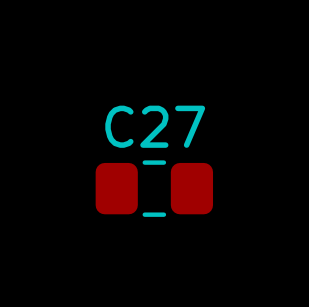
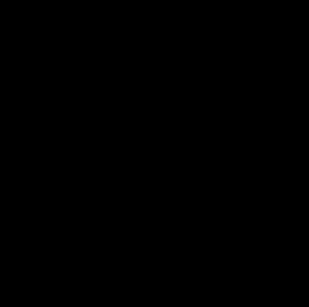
C27: (154, 188) -> none

